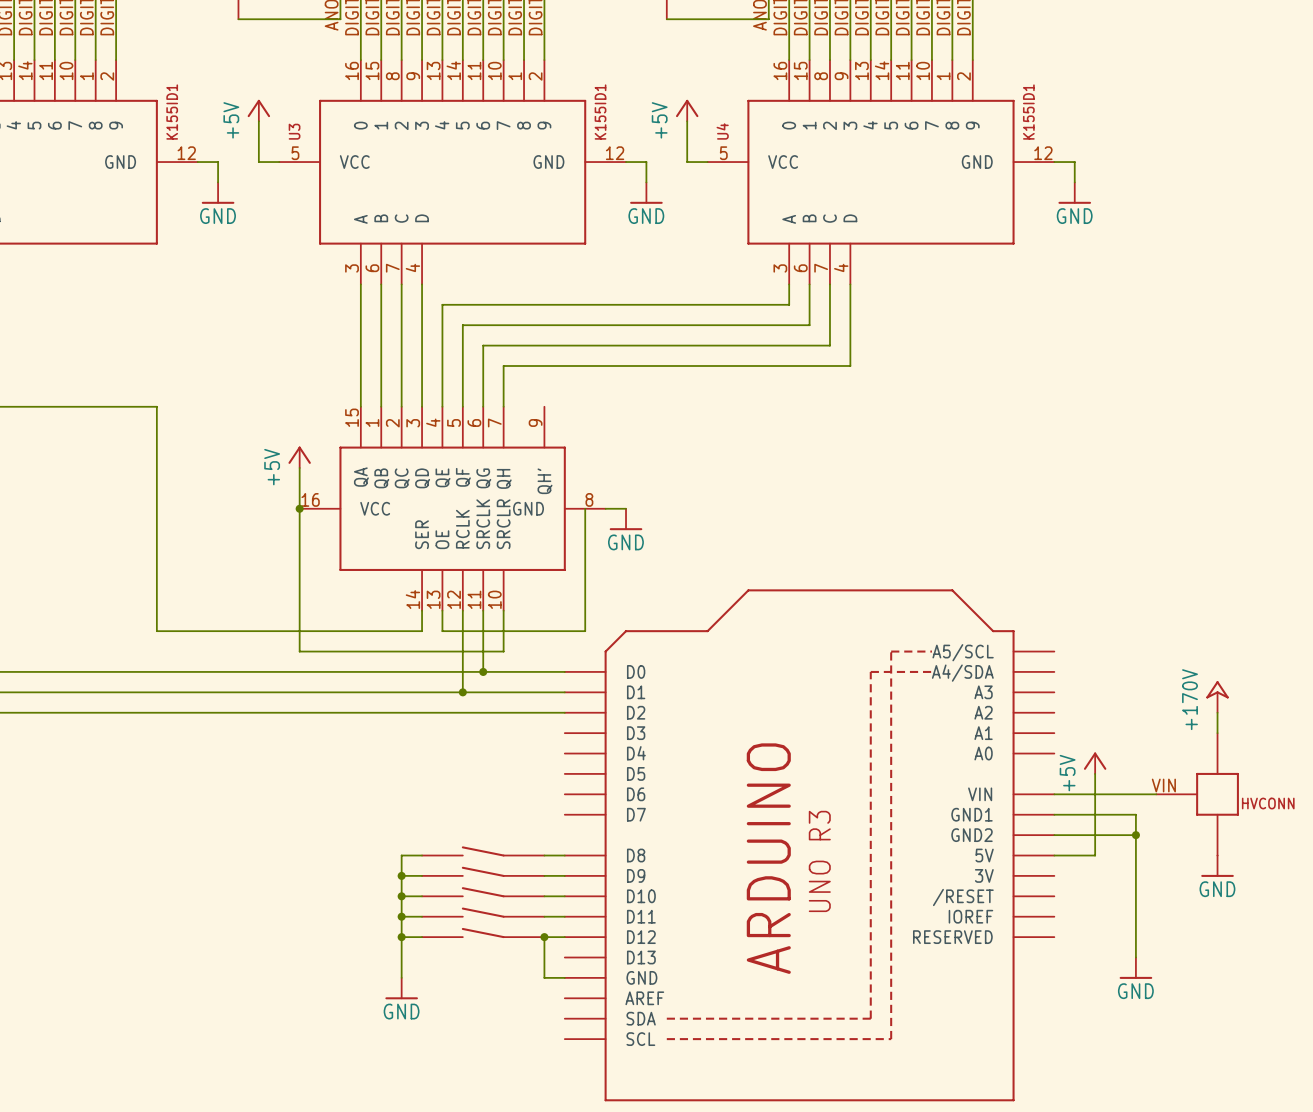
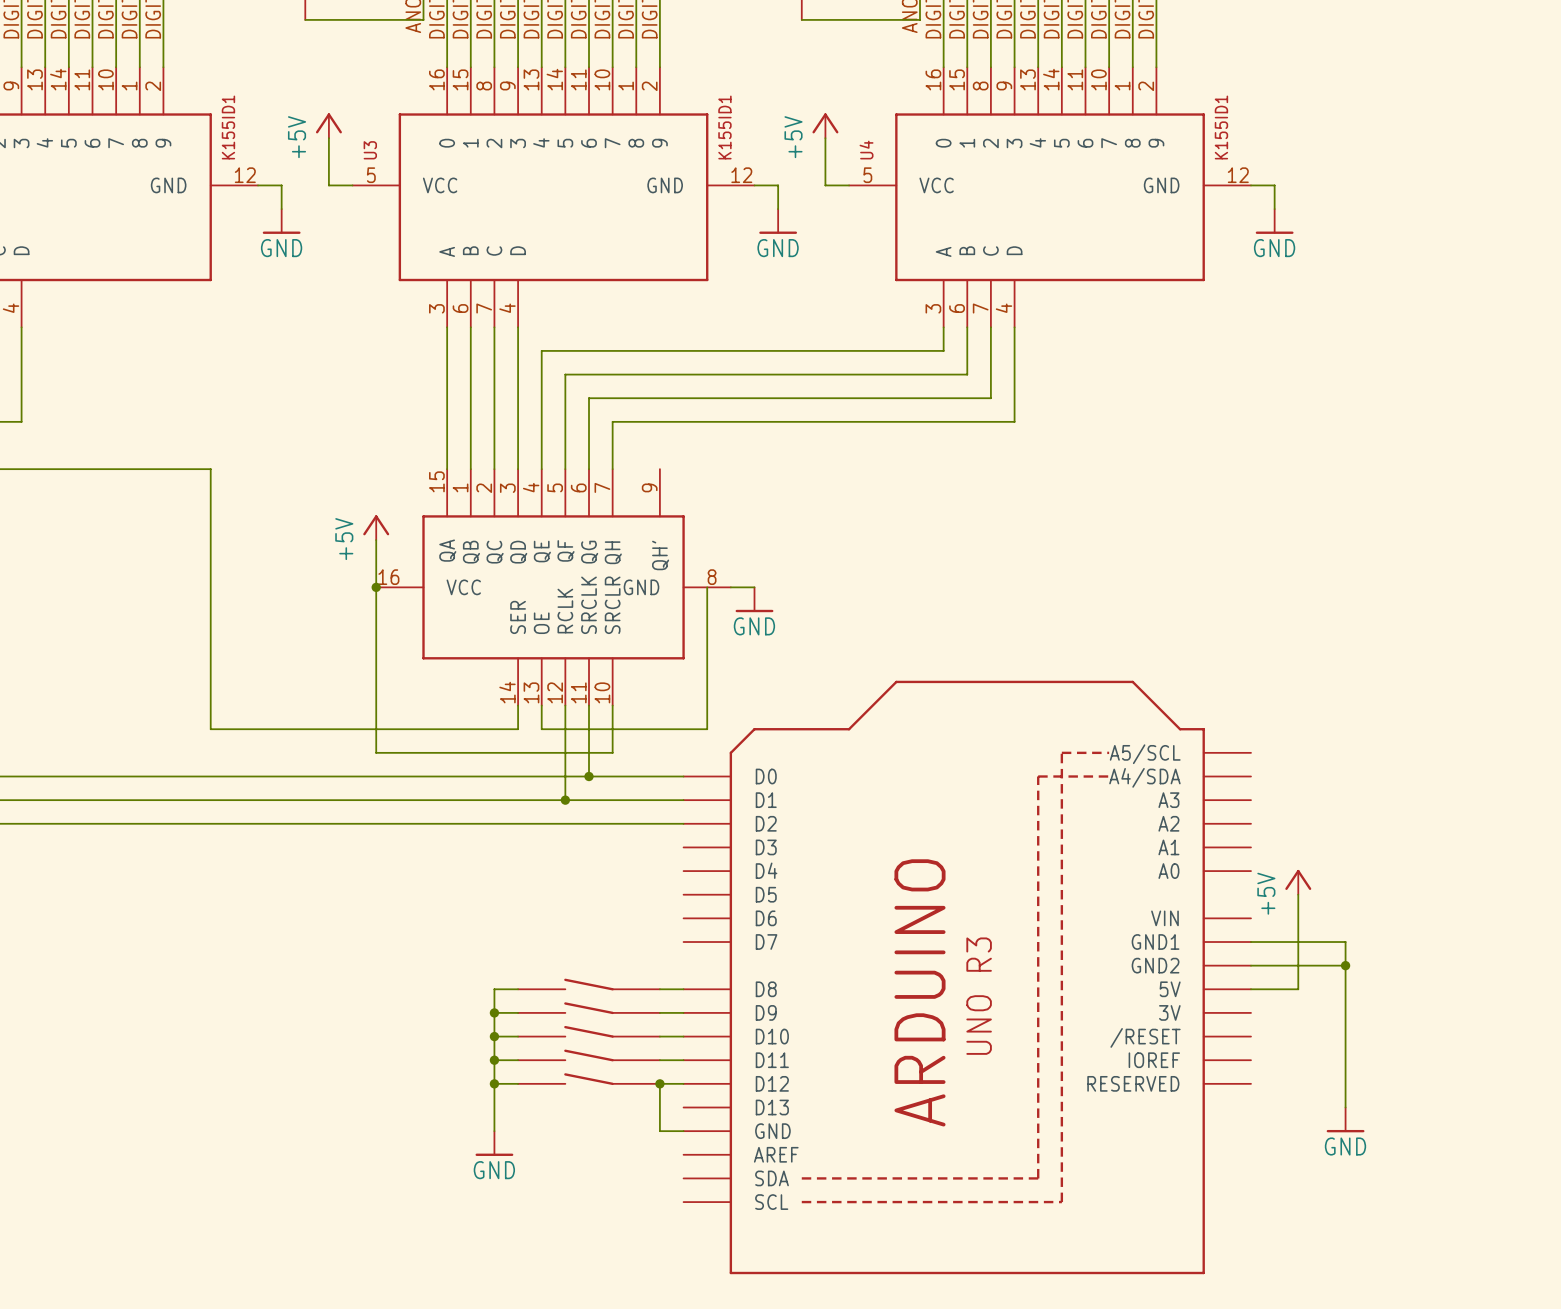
power symbol: +170V (1217, 696) -> none
wire: (1217, 712) (1217, 733) -> none
wire: (1054, 794) (1156, 794) -> none
HVCONN: (1197, 794) -> none
power symbol: GND (1217, 866) -> none

